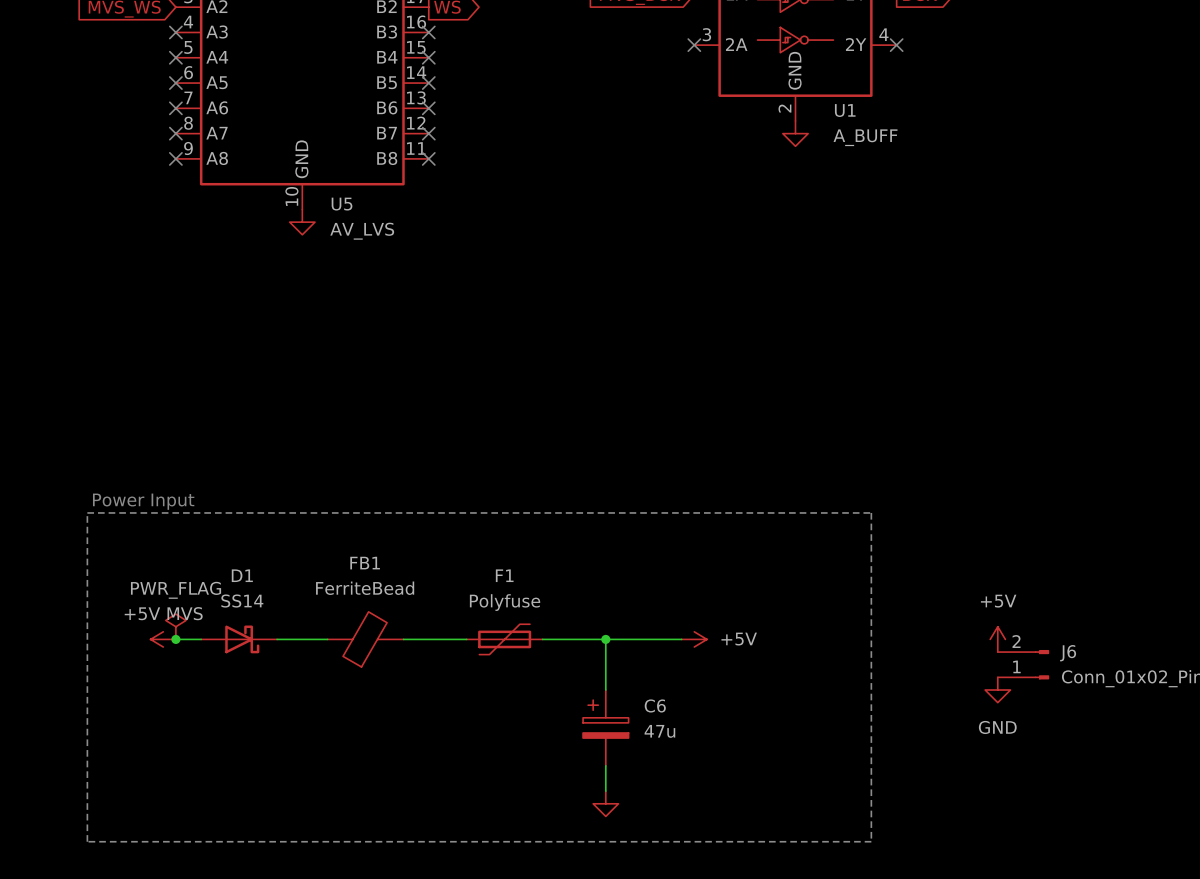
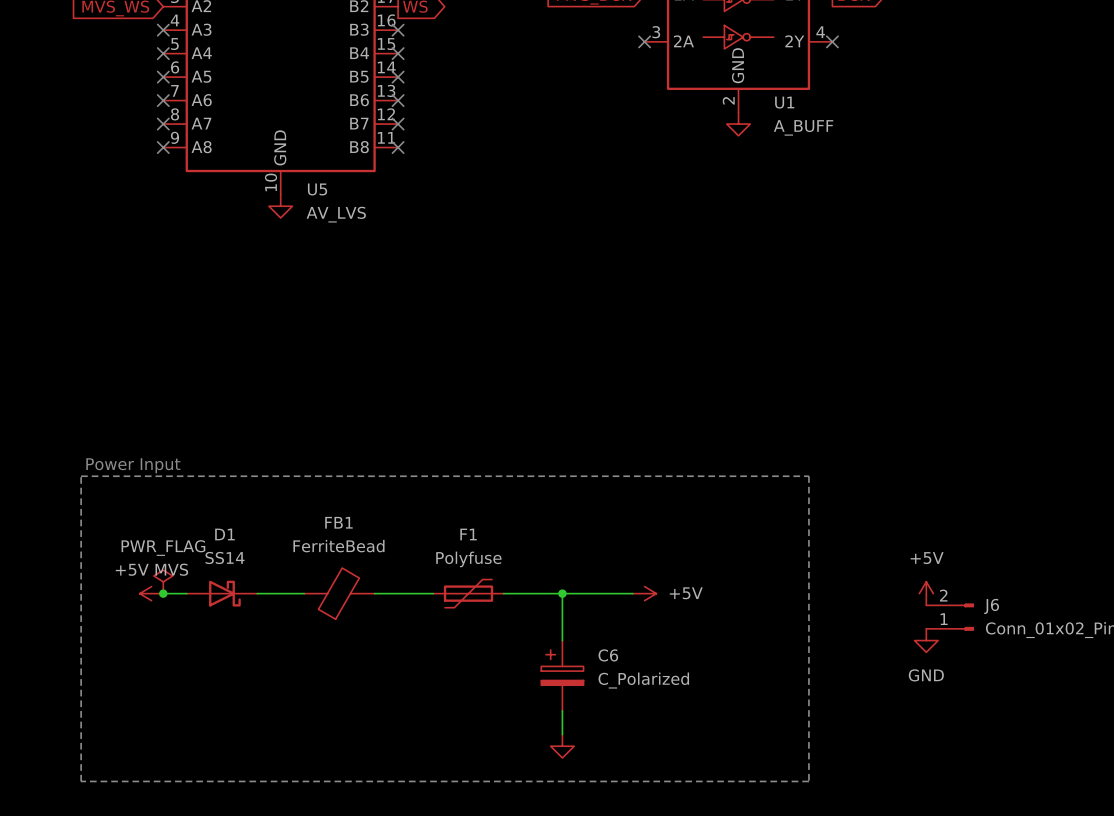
C6 value: 47u (659, 731) -> C_Polarized (643, 680)

